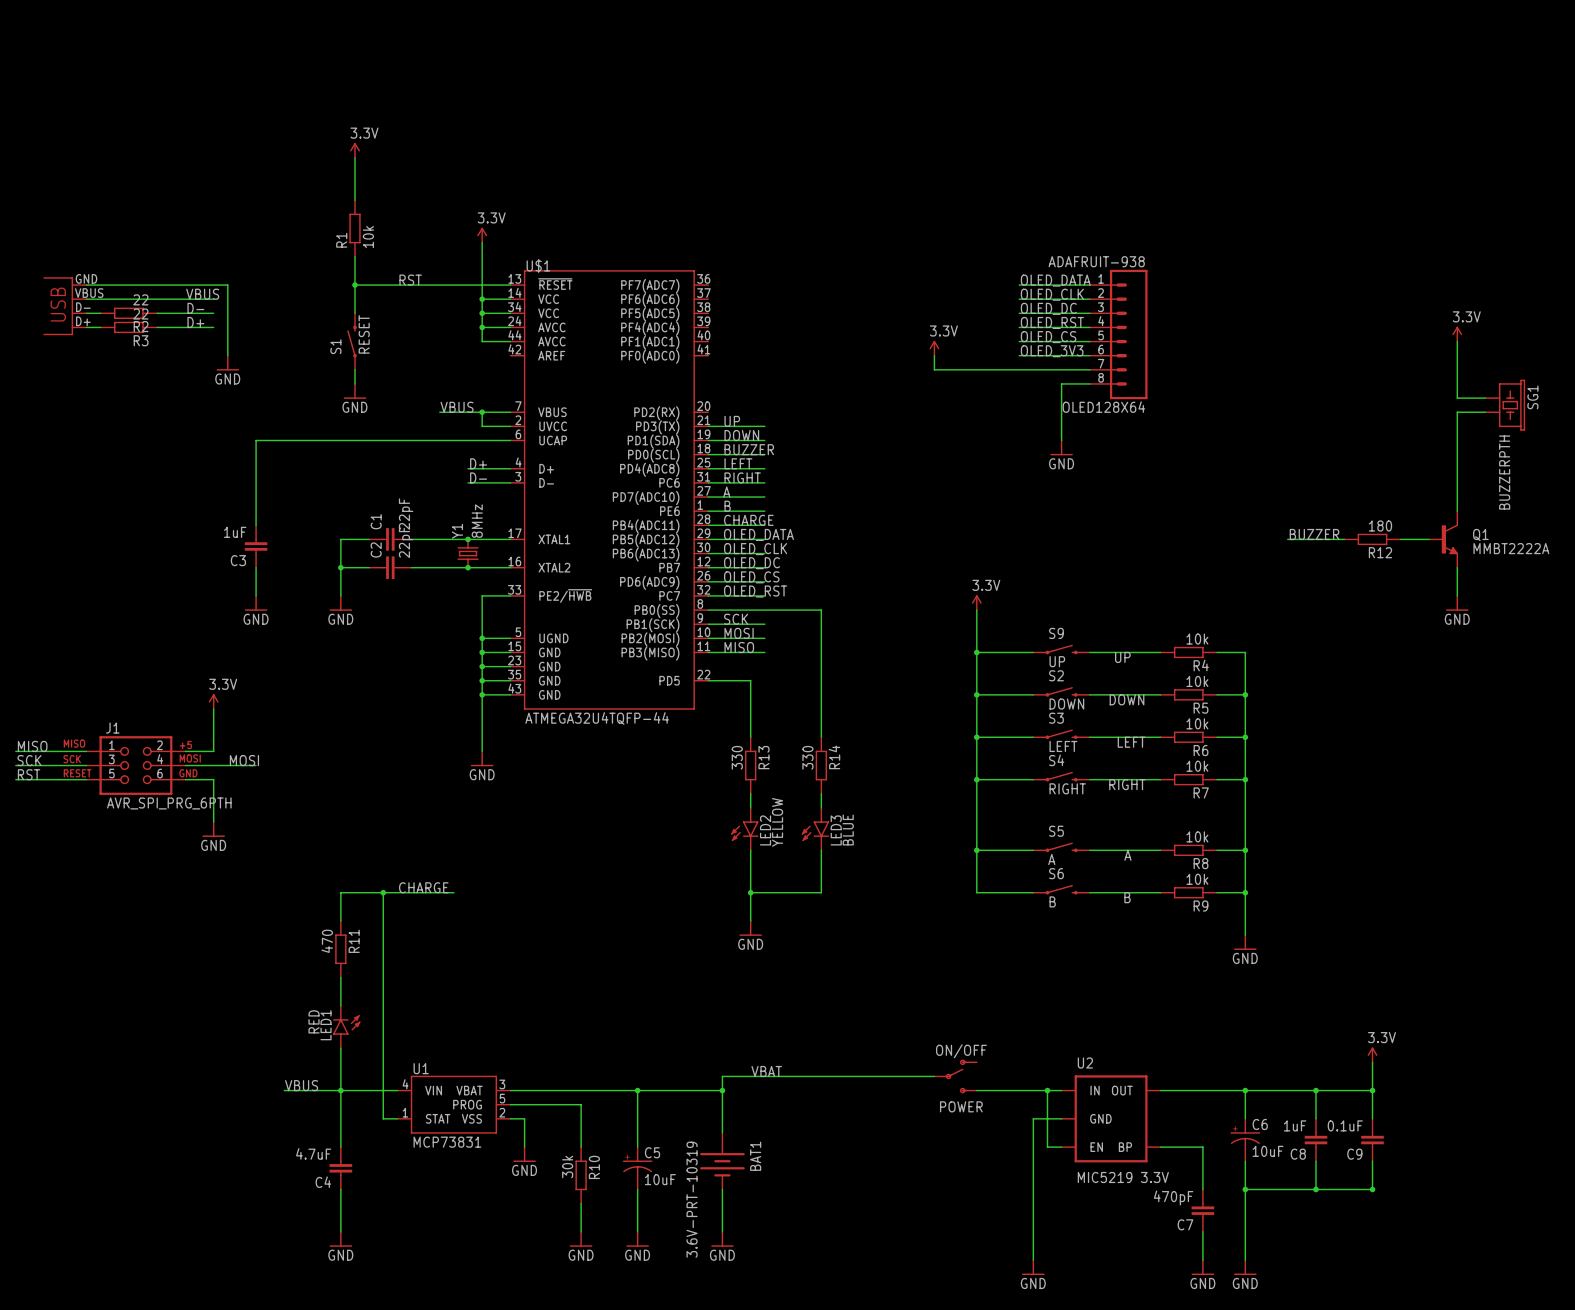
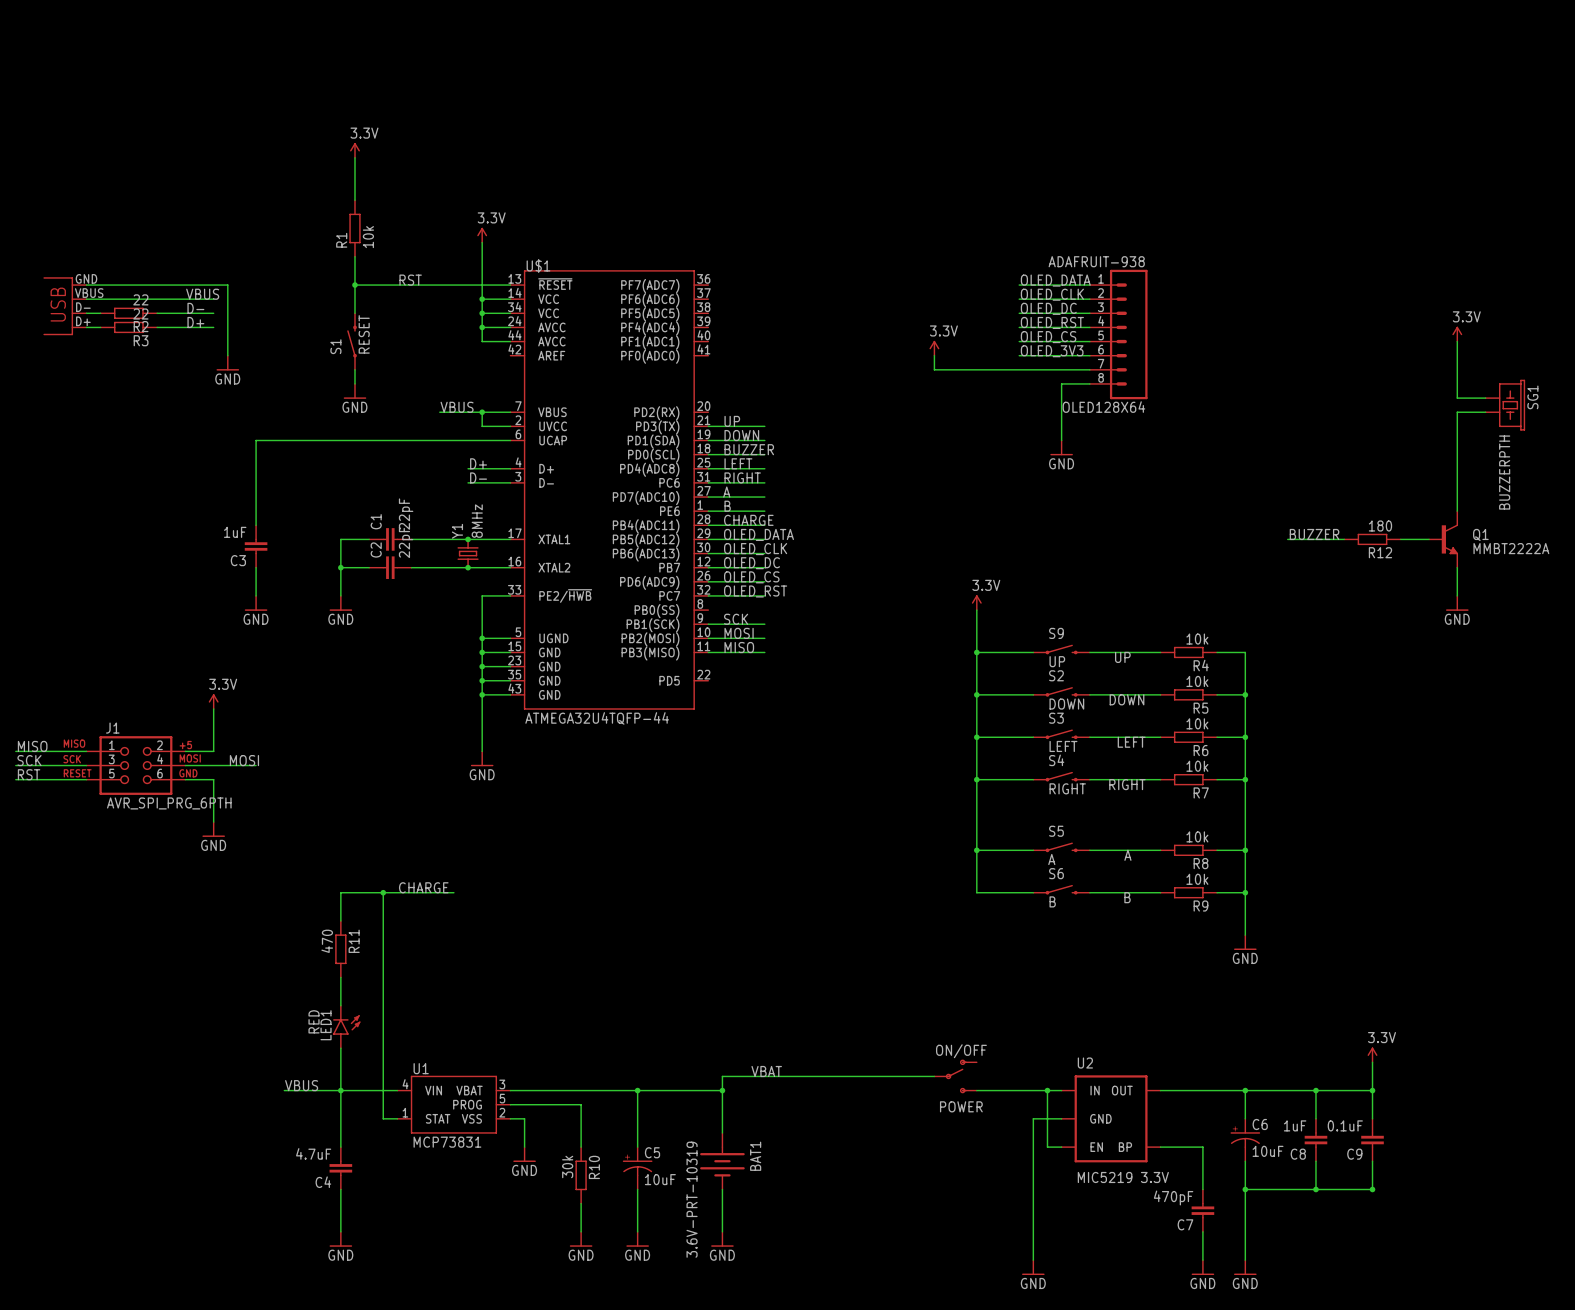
wire: (708, 610) (821, 610) (821, 737) -> none
wire: (708, 680) (750, 680) (750, 737) -> none
R13: 330 (750, 765) -> none
R14: 330 (821, 765) -> none
wire: (750, 793) (750, 807) -> none
wire: (821, 793) (821, 807) -> none
LED2: YELLOW (744, 829) -> none
LED3: BLUE (815, 829) -> none
wire: (750, 850) (750, 920) -> none
wire: (821, 850) (821, 892) (750, 892) -> none
junction: (750, 892) -> none
power symbol: GND (750, 928) -> none

